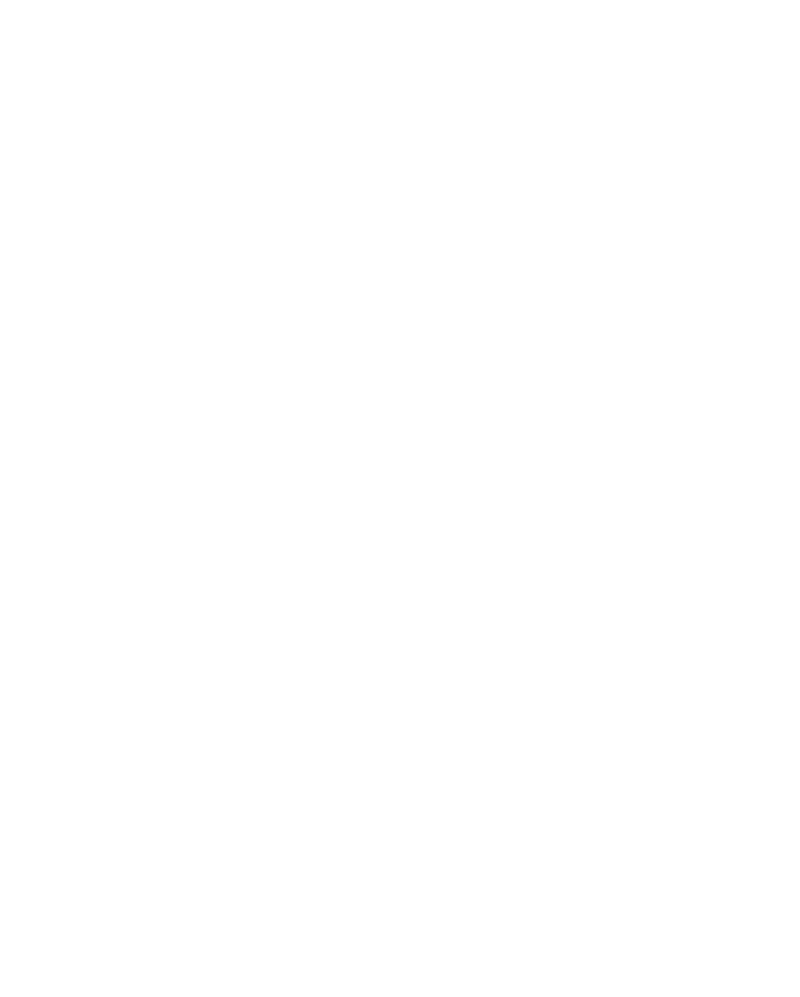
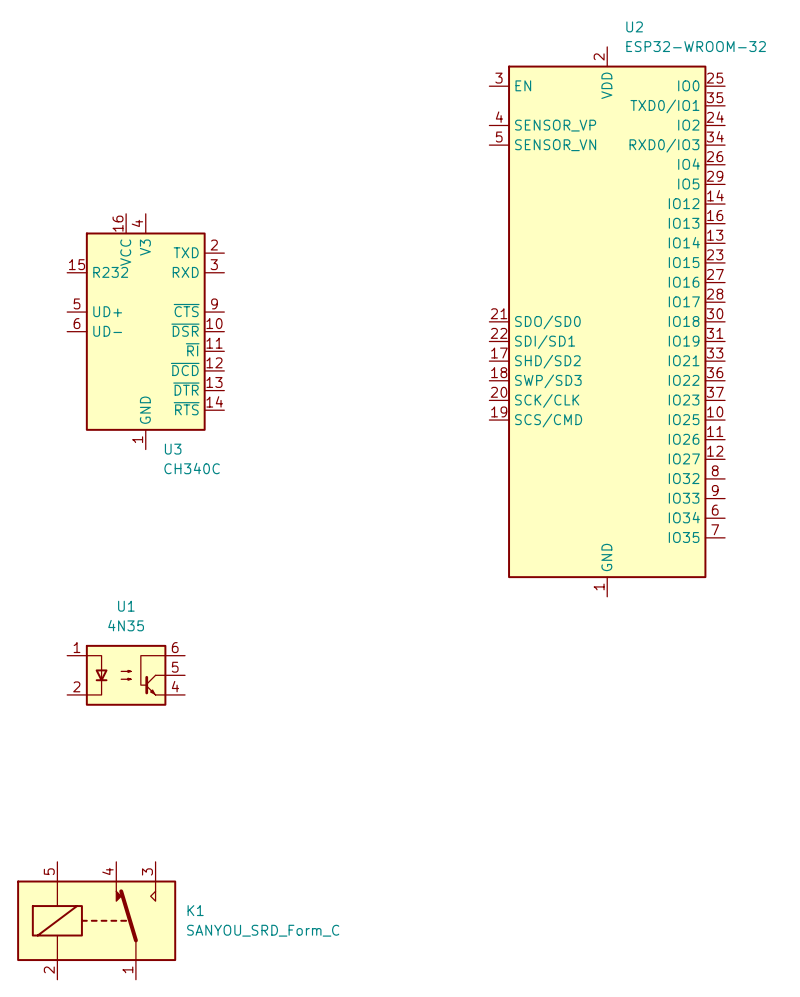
U2: none -> ESP32-WROOM-32 (607, 321)
U3: none -> CH340C (145, 331)
U1: none -> 4N35 (126, 675)
K1: none -> SANYOU_SRD_Form_C (96, 920)

